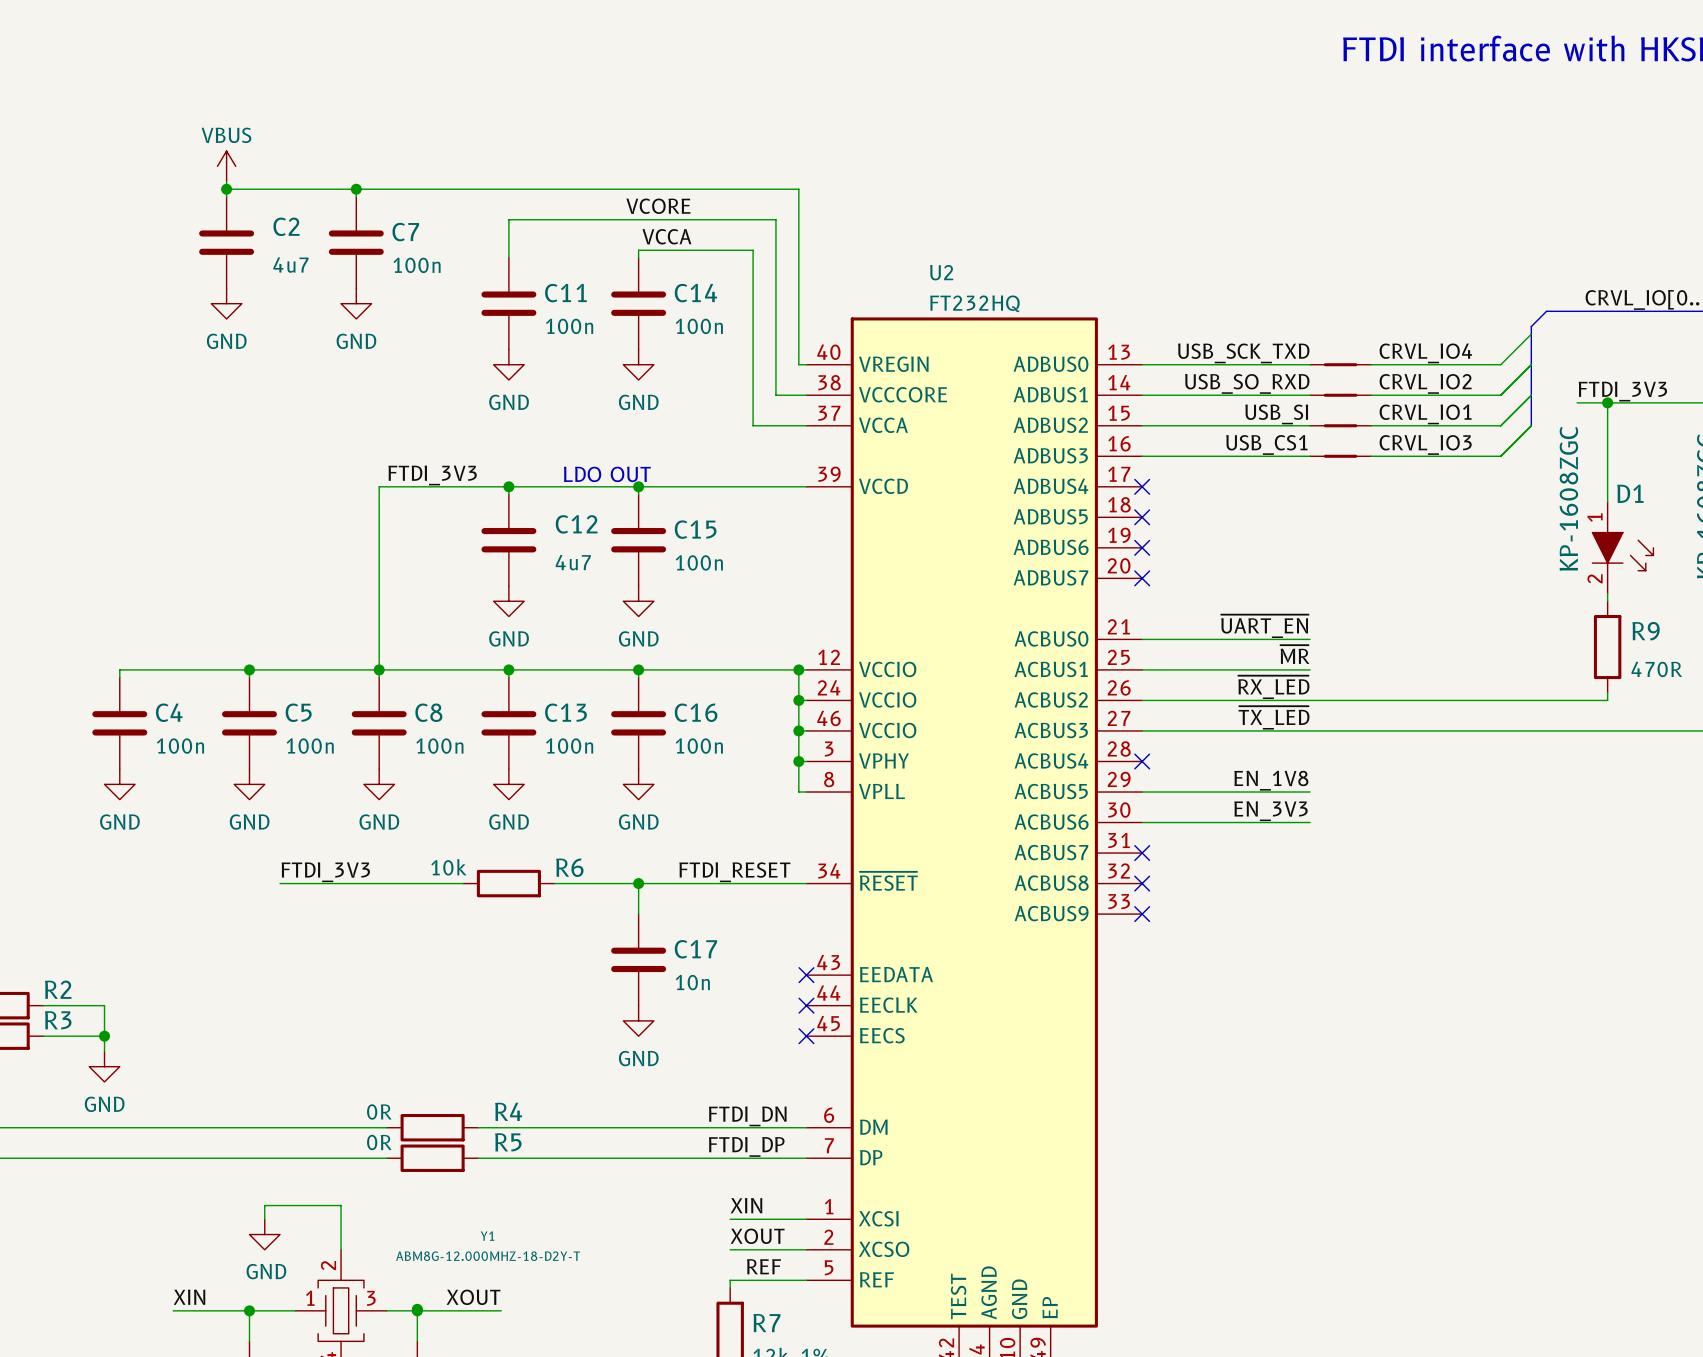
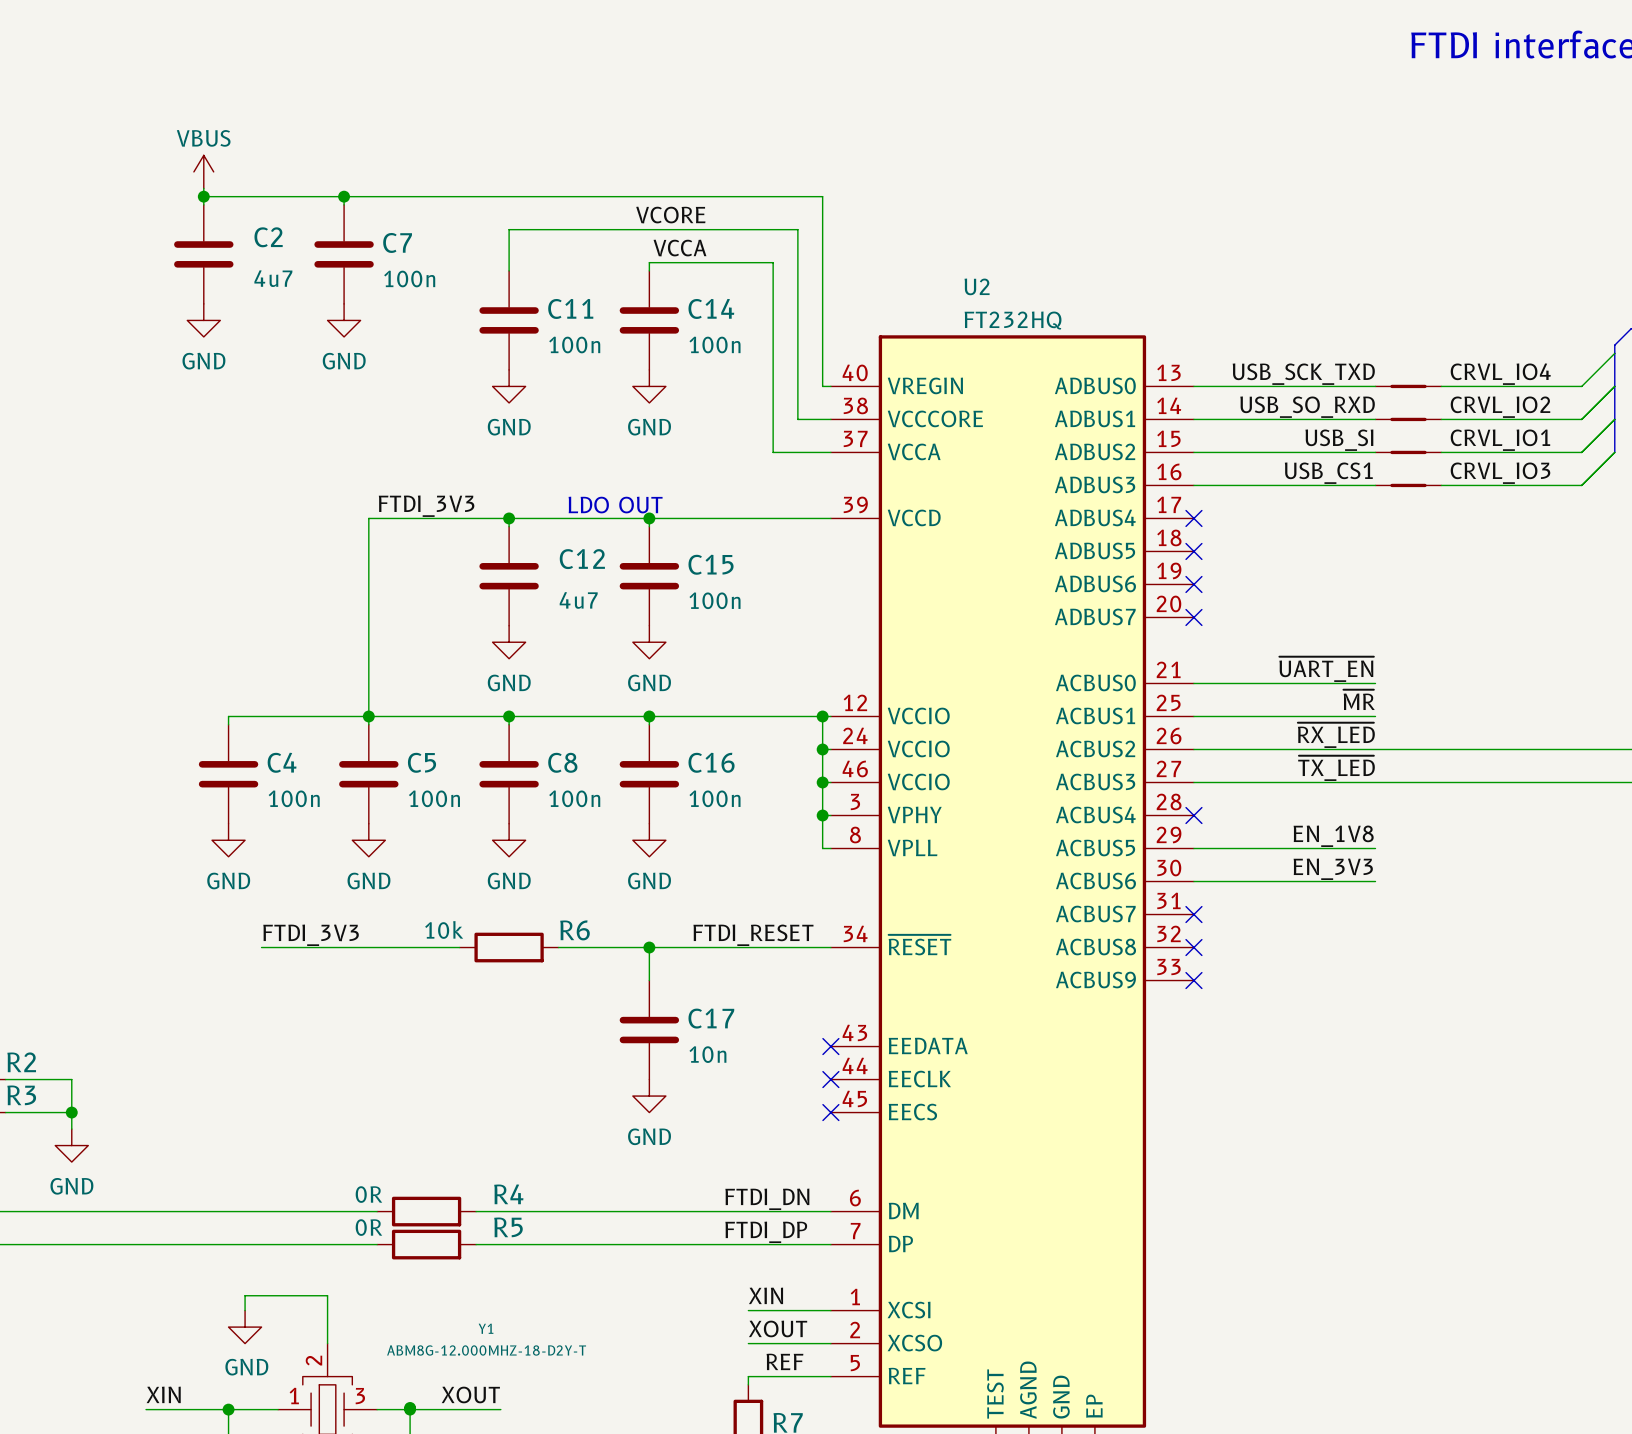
wire: (249, 669) (119, 669) (119, 677) -> none
junction: (249, 669) -> none
C5 name: C5 (298, 712) -> C4 (282, 762)
C8 name: C8 (428, 712) -> C5 (422, 762)
C13 name: C13 (565, 712) -> C8 (562, 762)
C4: (119, 723) -> none
power symbol: GND (119, 784) -> none

